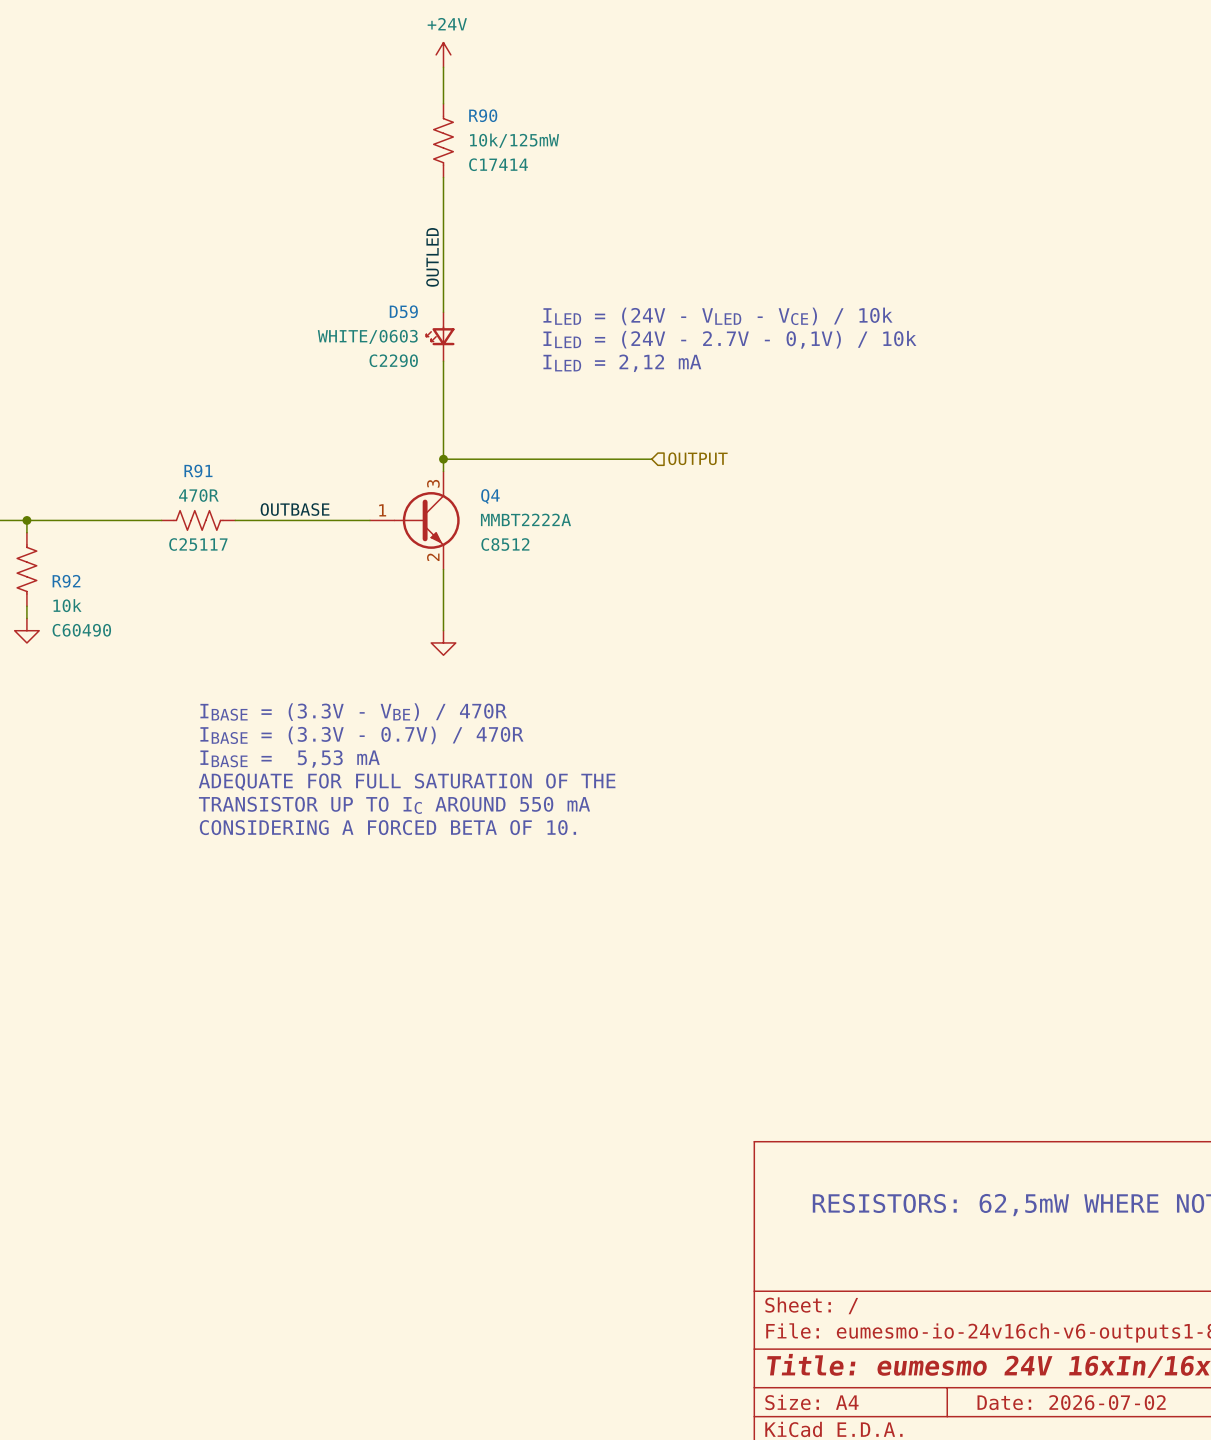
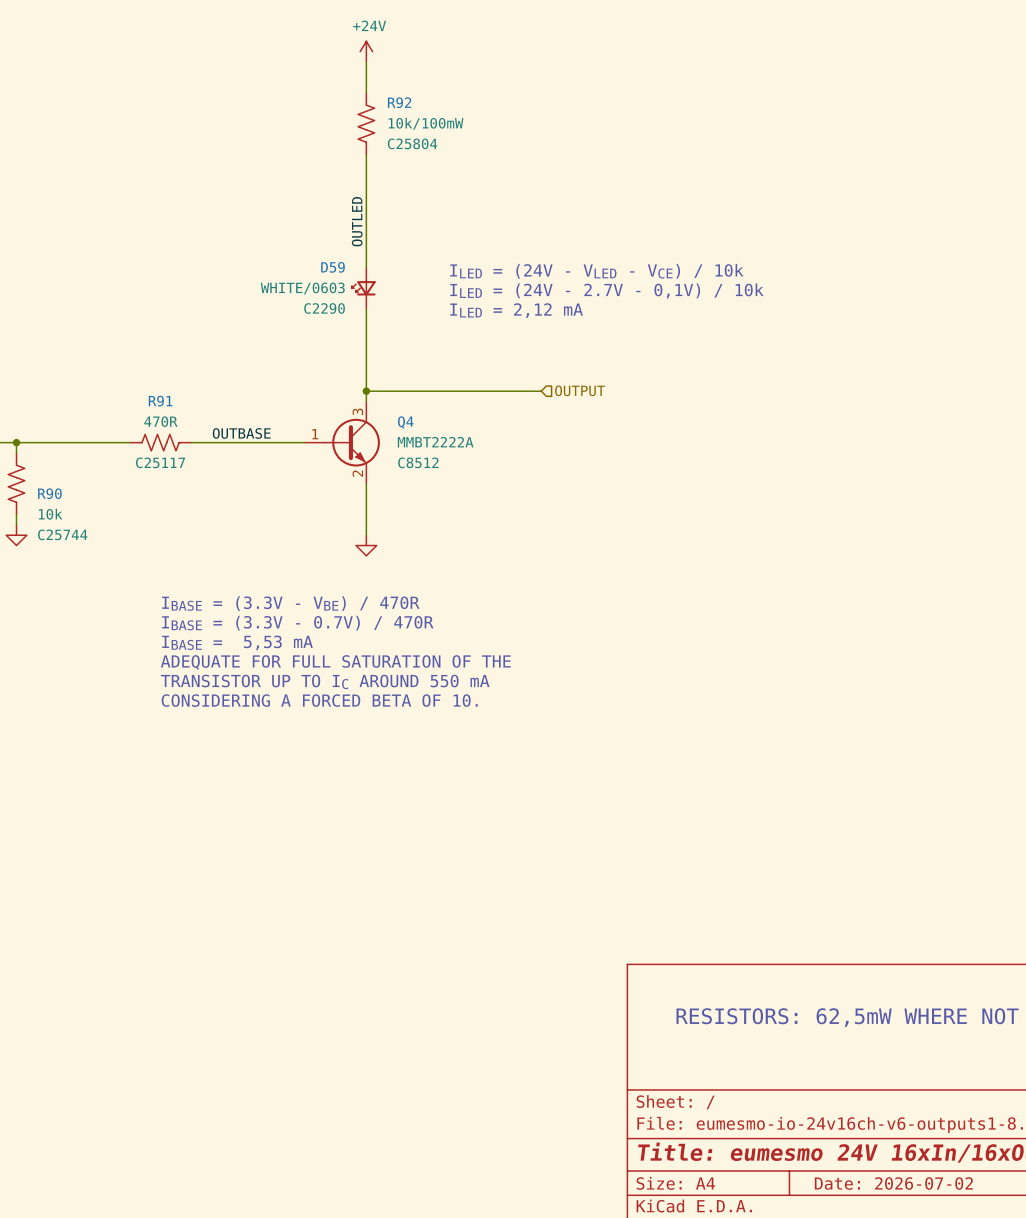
R90 name: R90 (483, 115) -> R92 (399, 102)
R90 value: 10k/125mW (514, 140) -> 10k/100mW (426, 123)
R90 text: C17414 (498, 164) -> C25804 (412, 143)
R92 name: R92 (66, 581) -> R90 (49, 493)
R92 text: C60490 (81, 630) -> C25744 (62, 534)

